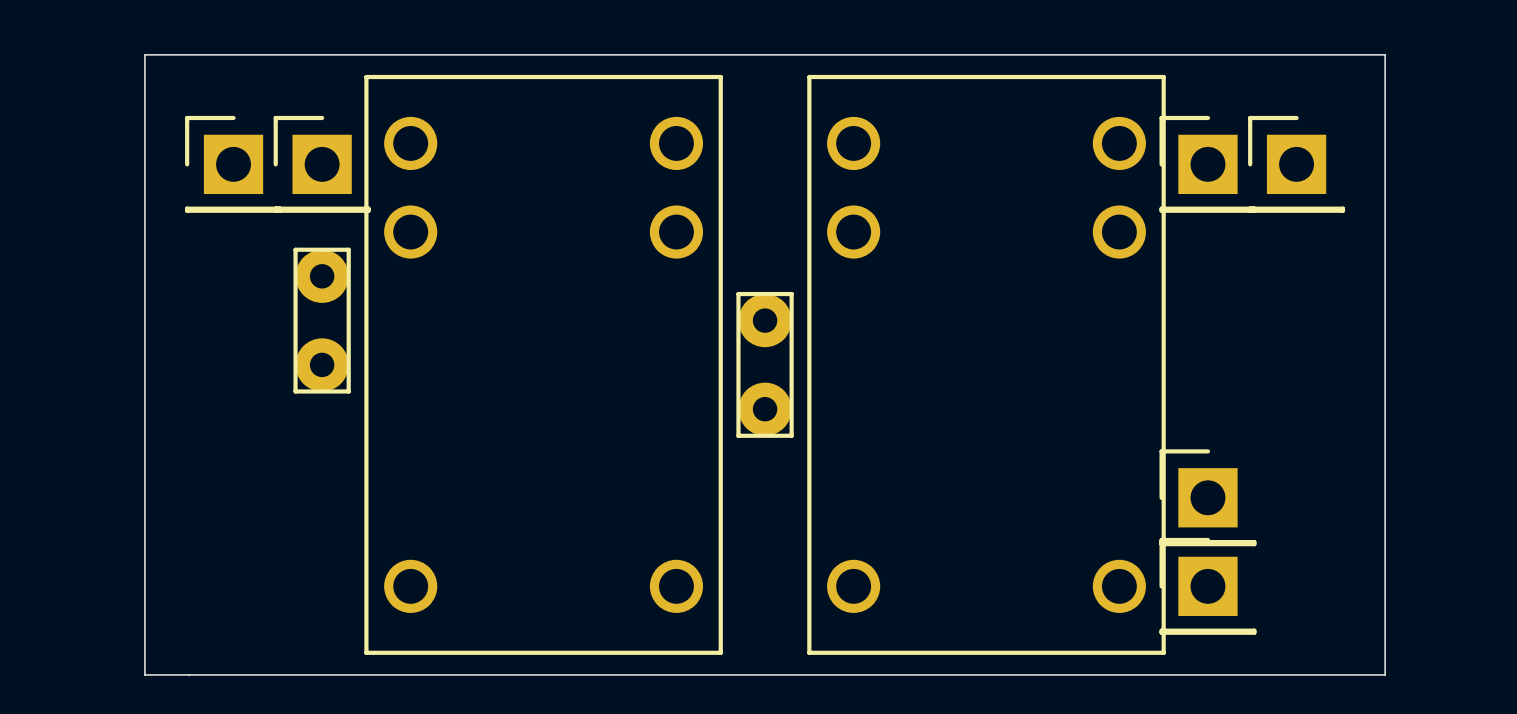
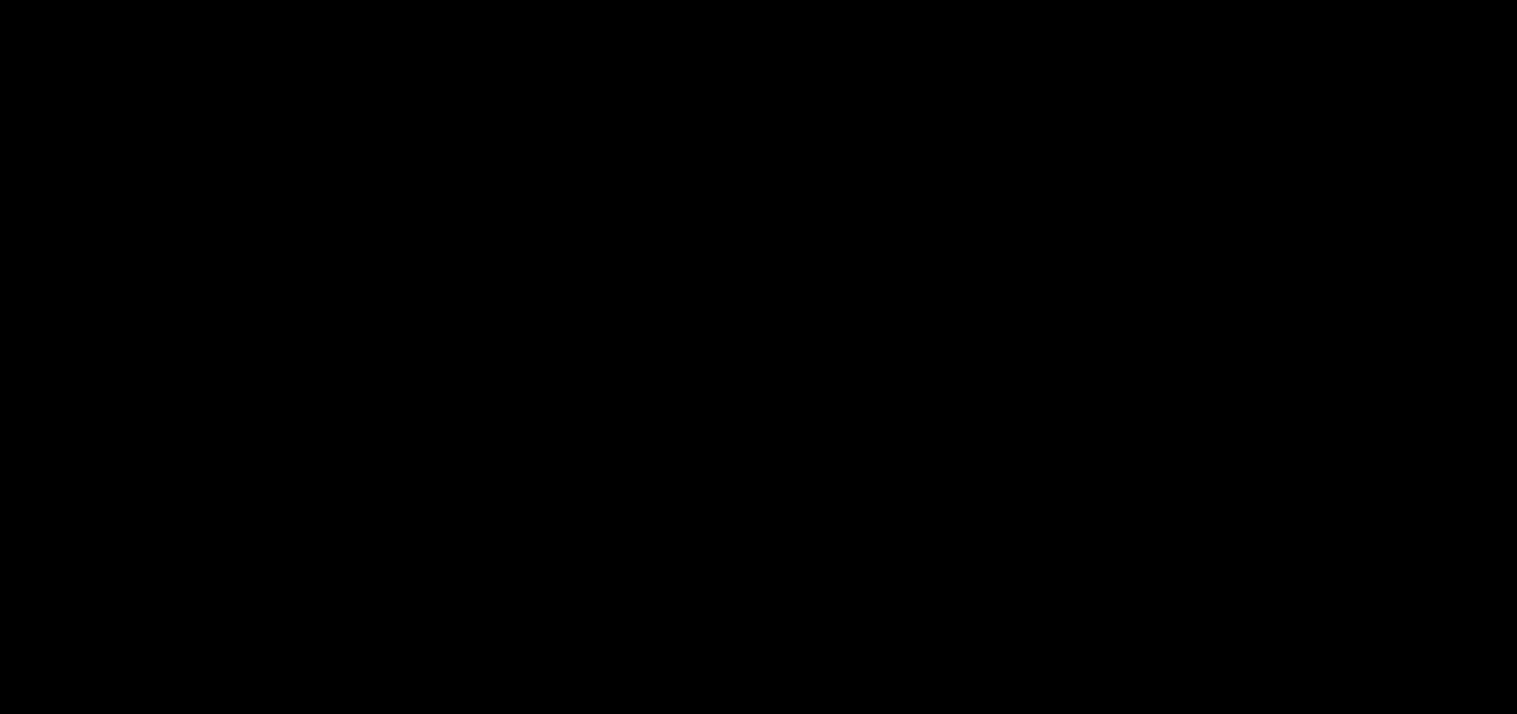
board edge: (144, 54) (144, 674) (1385, 674) (1385, 54) (144, 54) -> none
part: (233, 164) -> none
part: (322, 164) -> none
part: (1207, 164) -> none
part: (1296, 164) -> none
part: (322, 320) -> none
part: (543, 364) -> none
part: (765, 364) -> none
part: (986, 364) -> none
part: (1207, 497) -> none
part: (1207, 586) -> none

